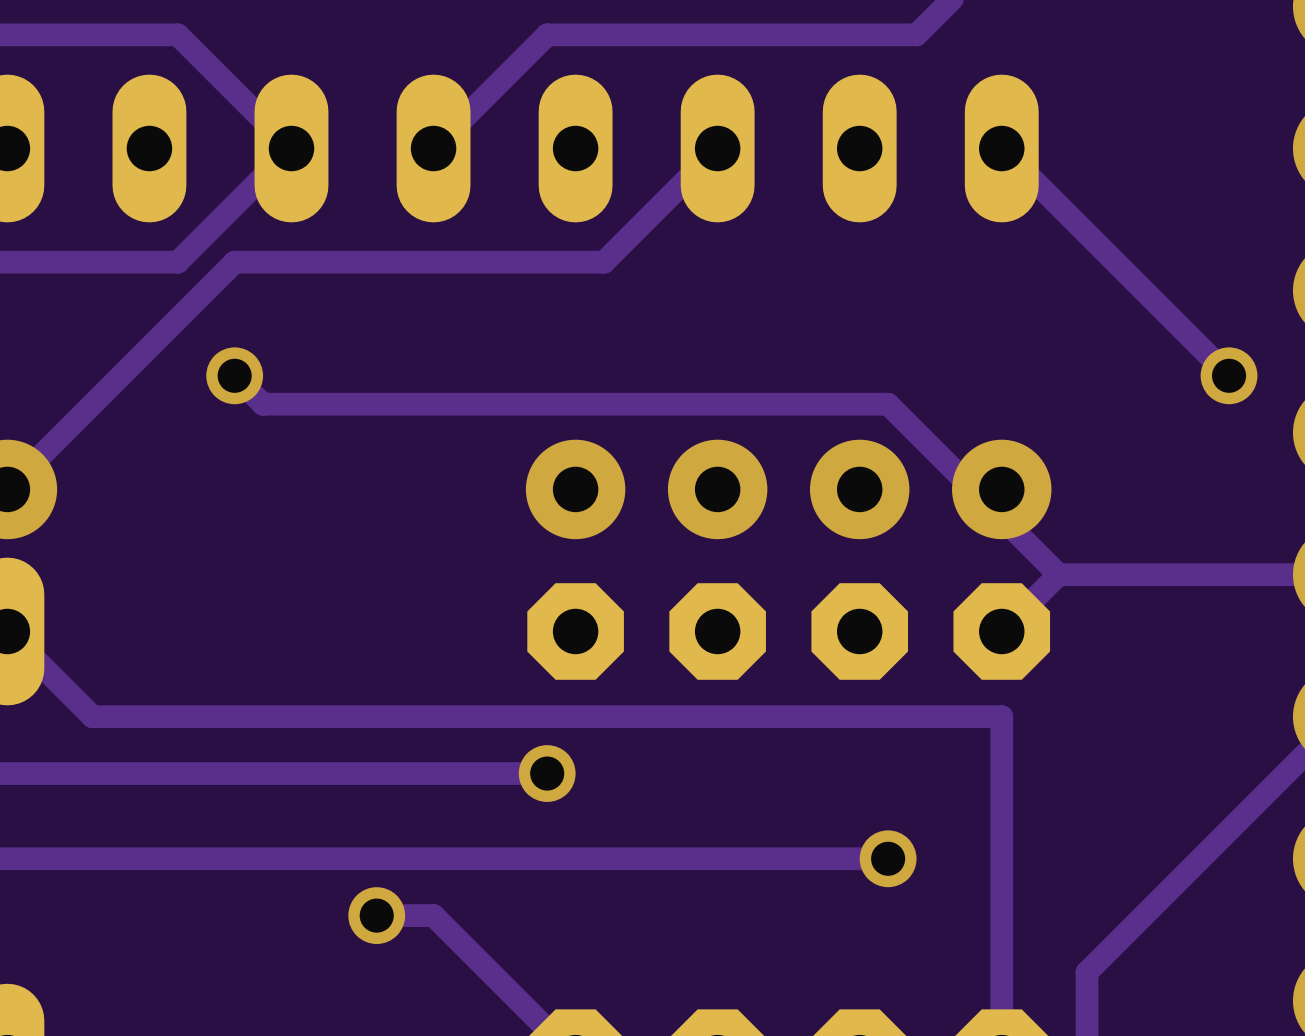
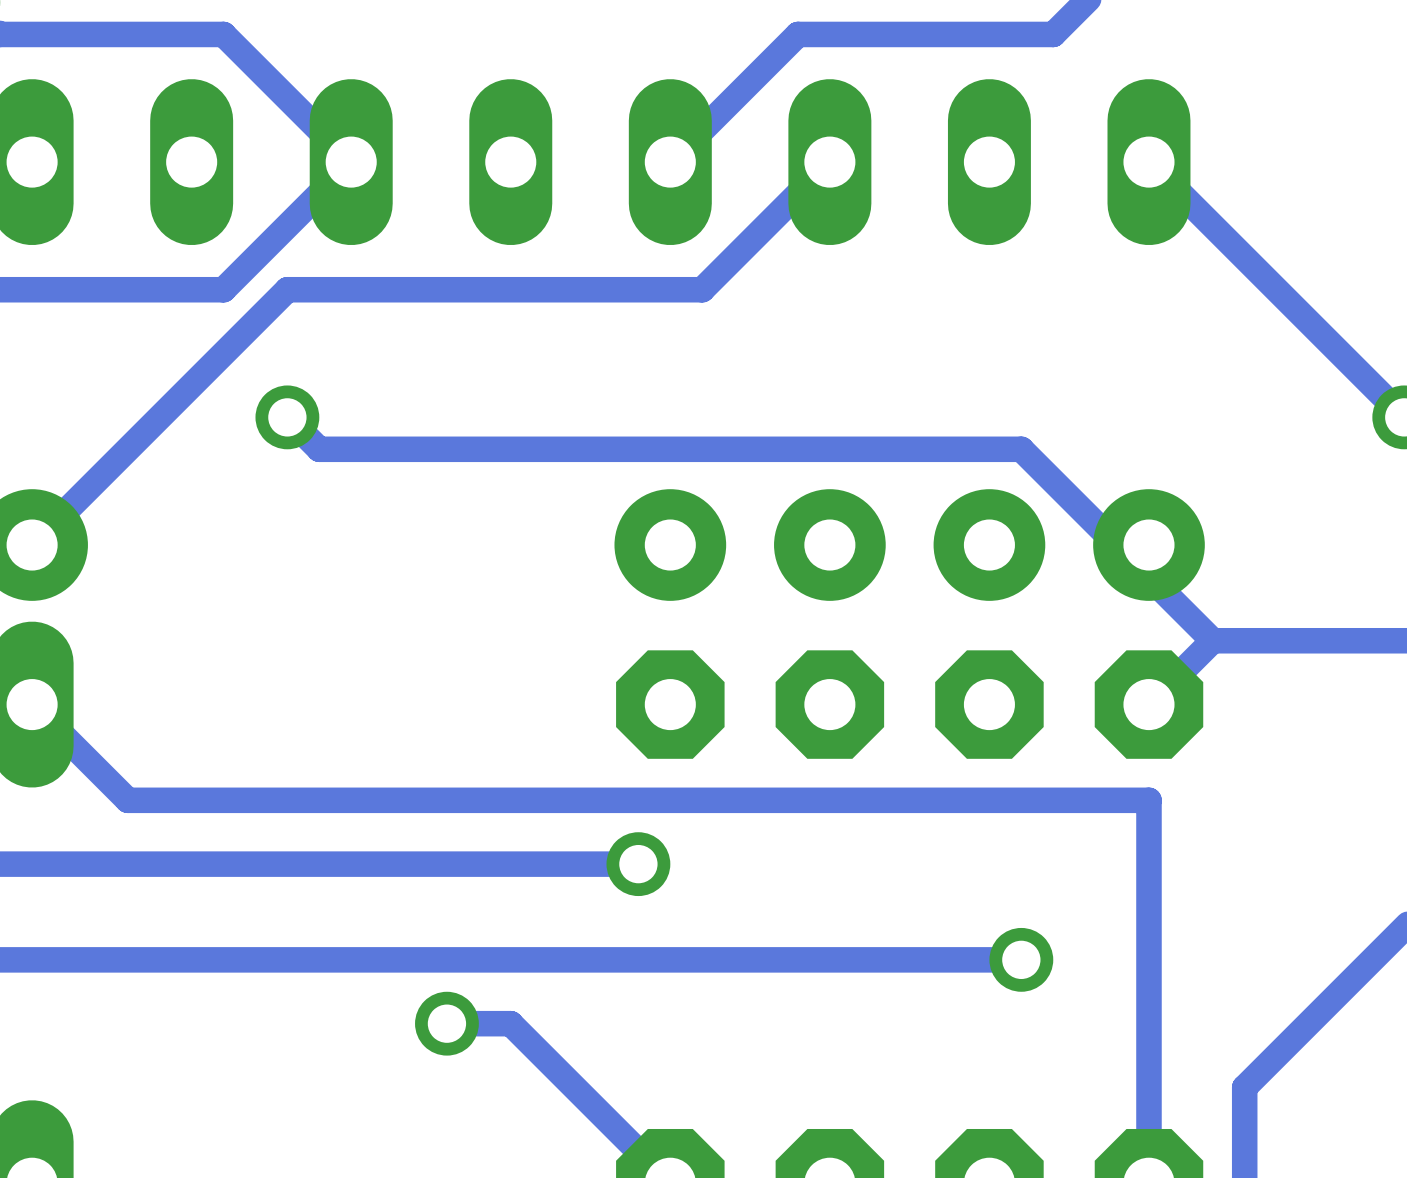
track: (689, 34) (547, 34) (433, 148) -> (797, 34) (670, 162)

